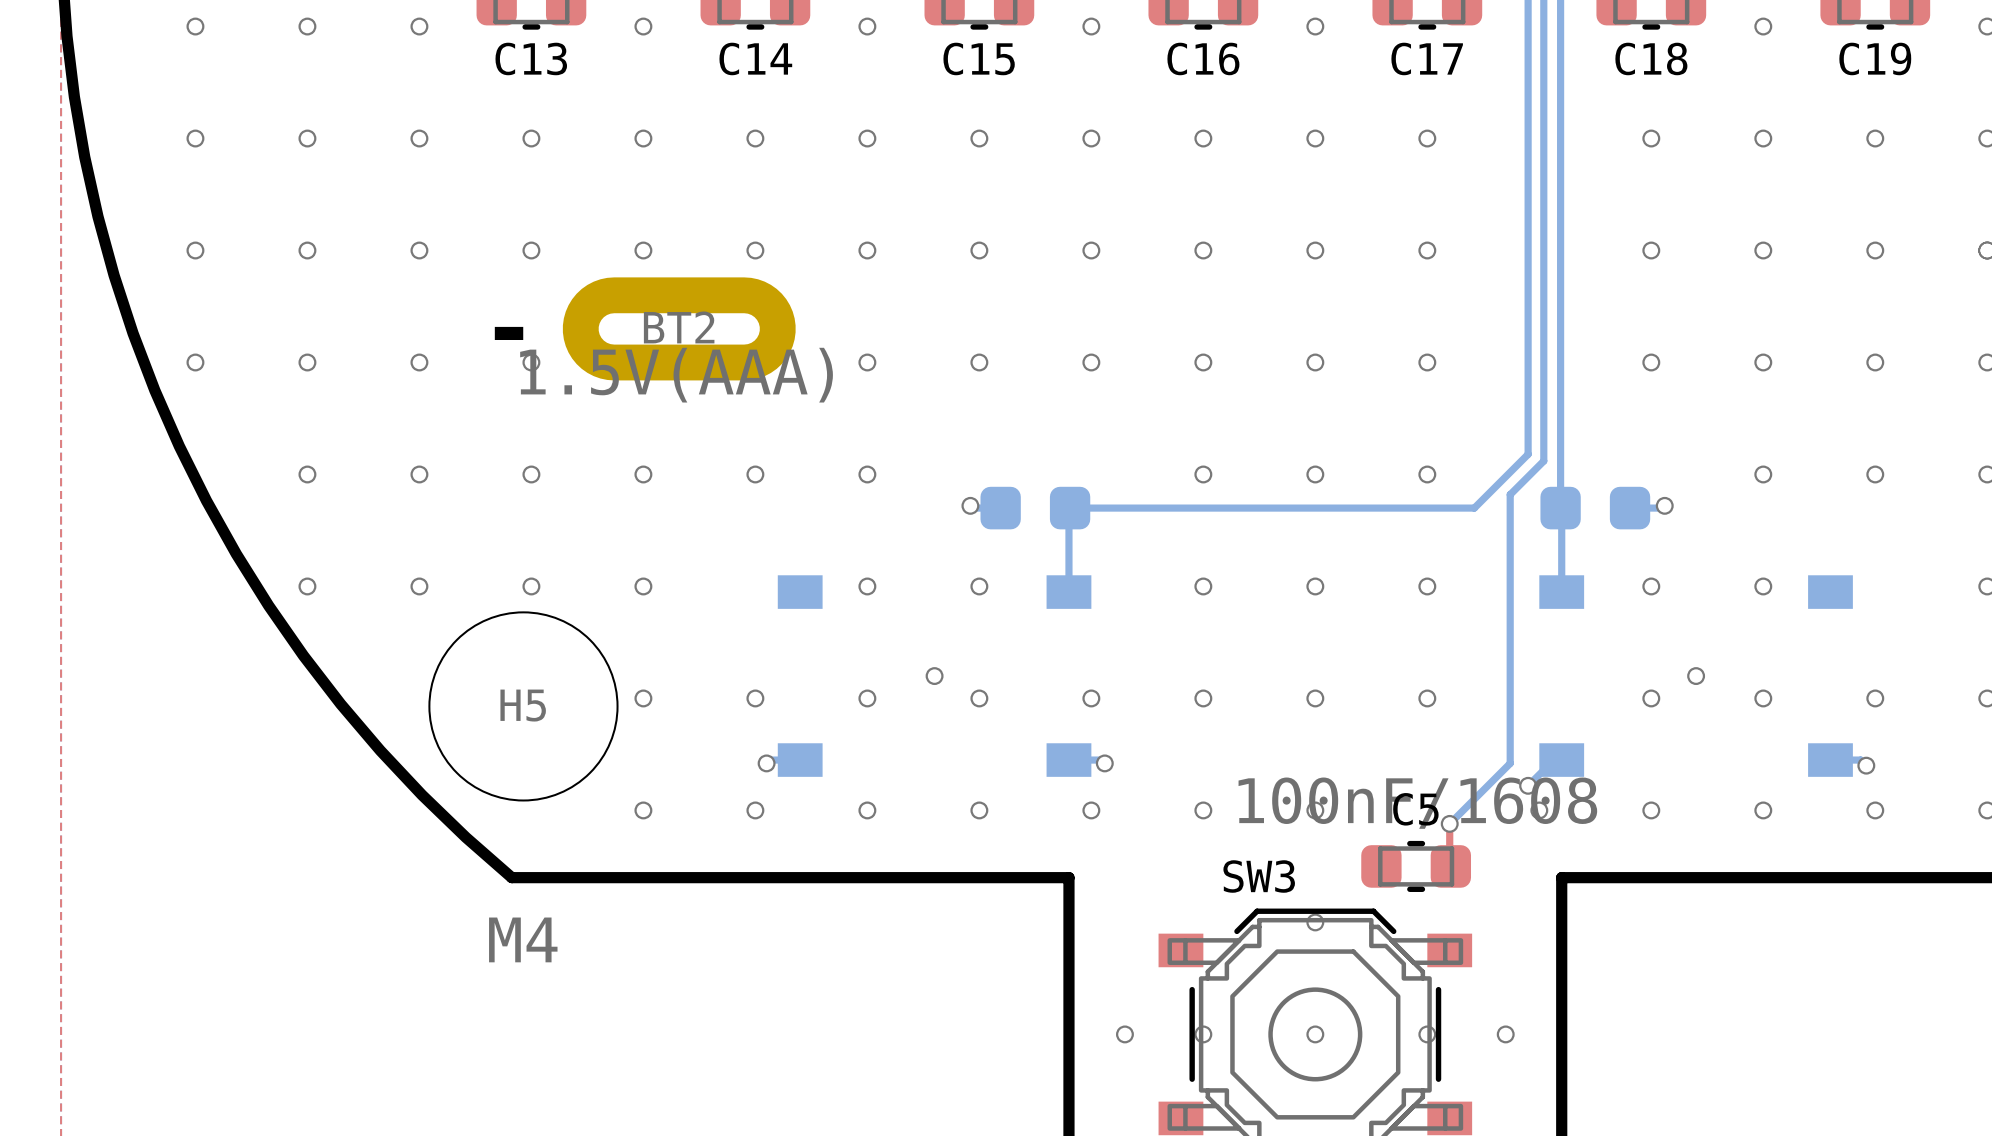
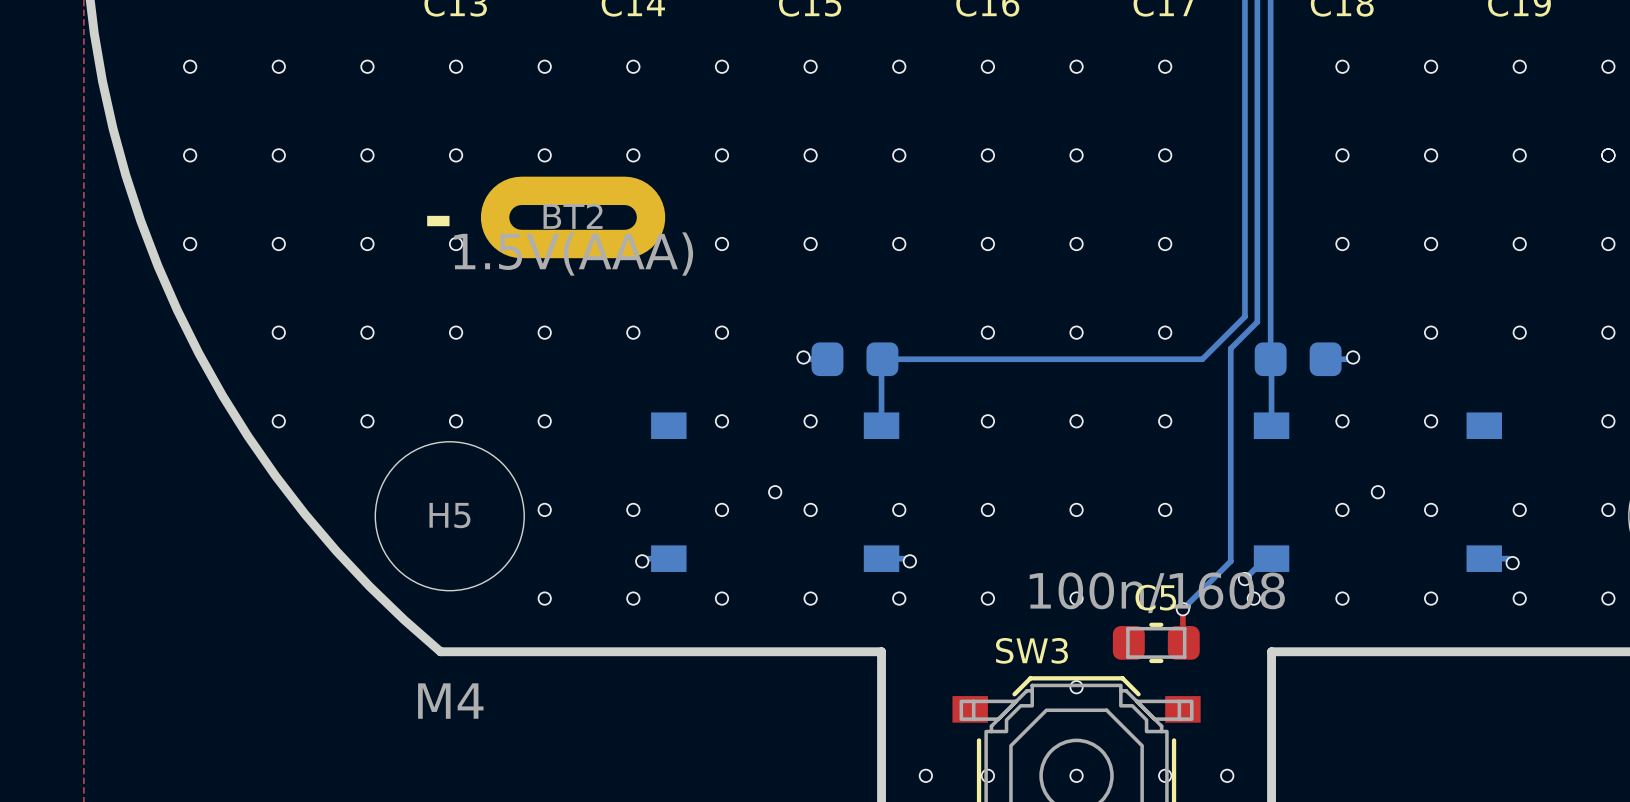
C5 value: 100nF/1608 (1417, 803) -> 100n/1608 (1157, 592)

